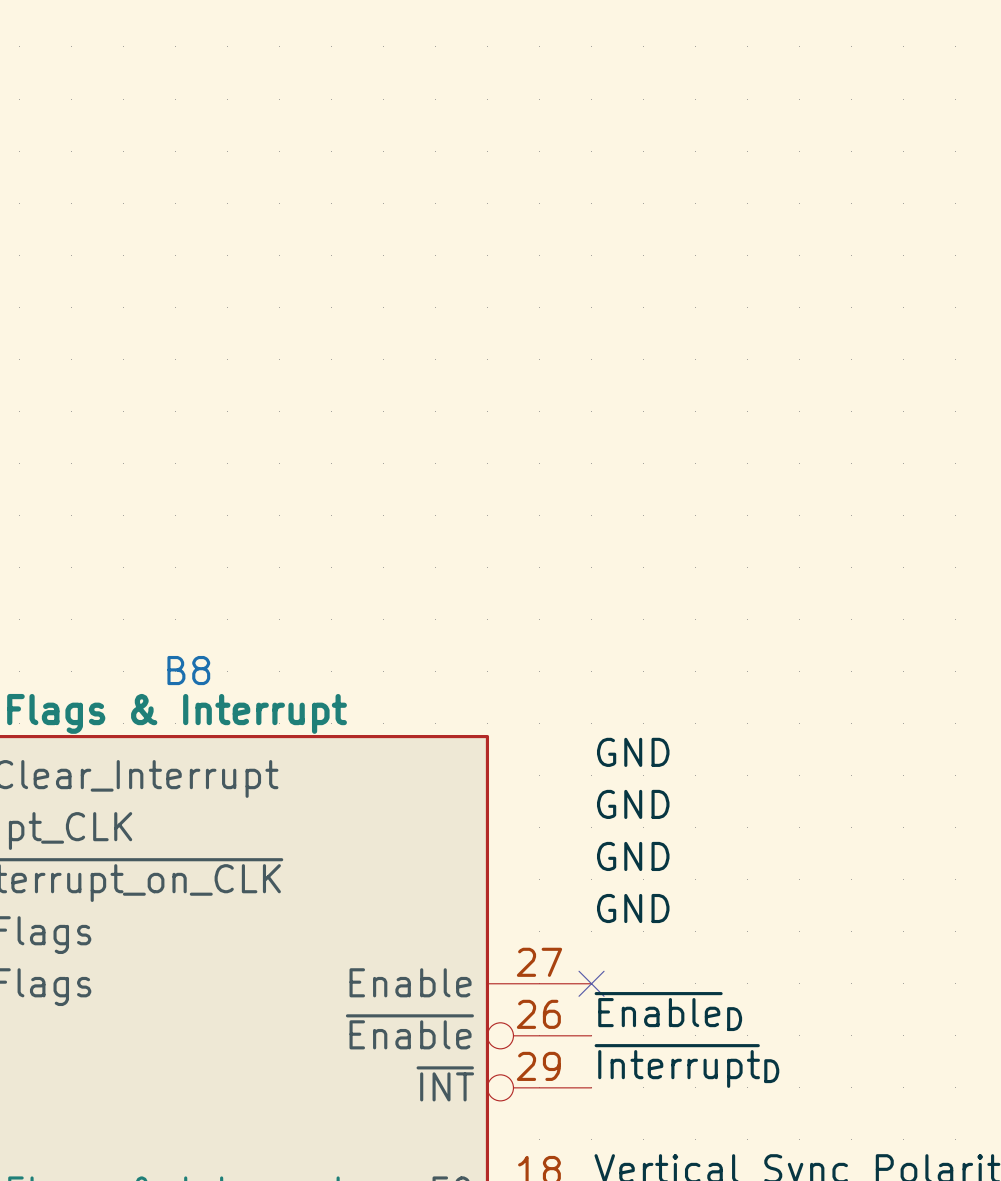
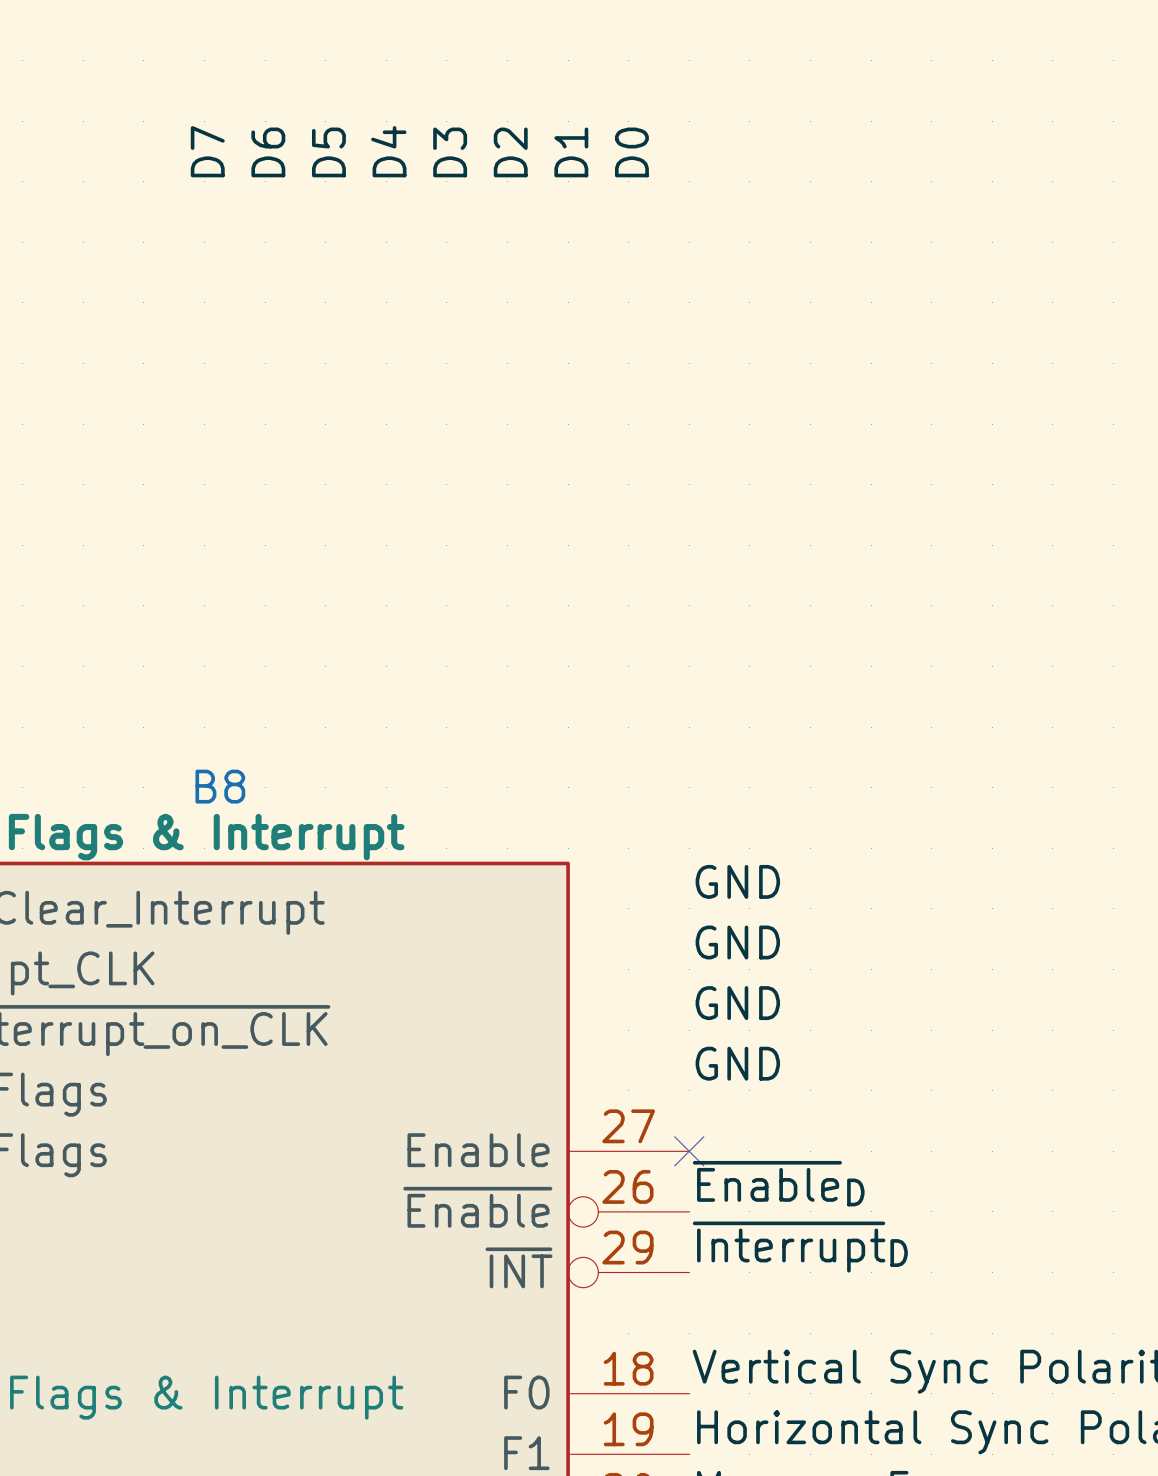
label: none -> D7 (207, 151)
label: none -> D6 (268, 152)
label: none -> D5 (328, 152)
label: none -> D4 (388, 151)
label: none -> D3 (450, 152)
label: none -> D2 (510, 152)
label: none -> D1 (571, 152)
label: none -> D0 (631, 152)

